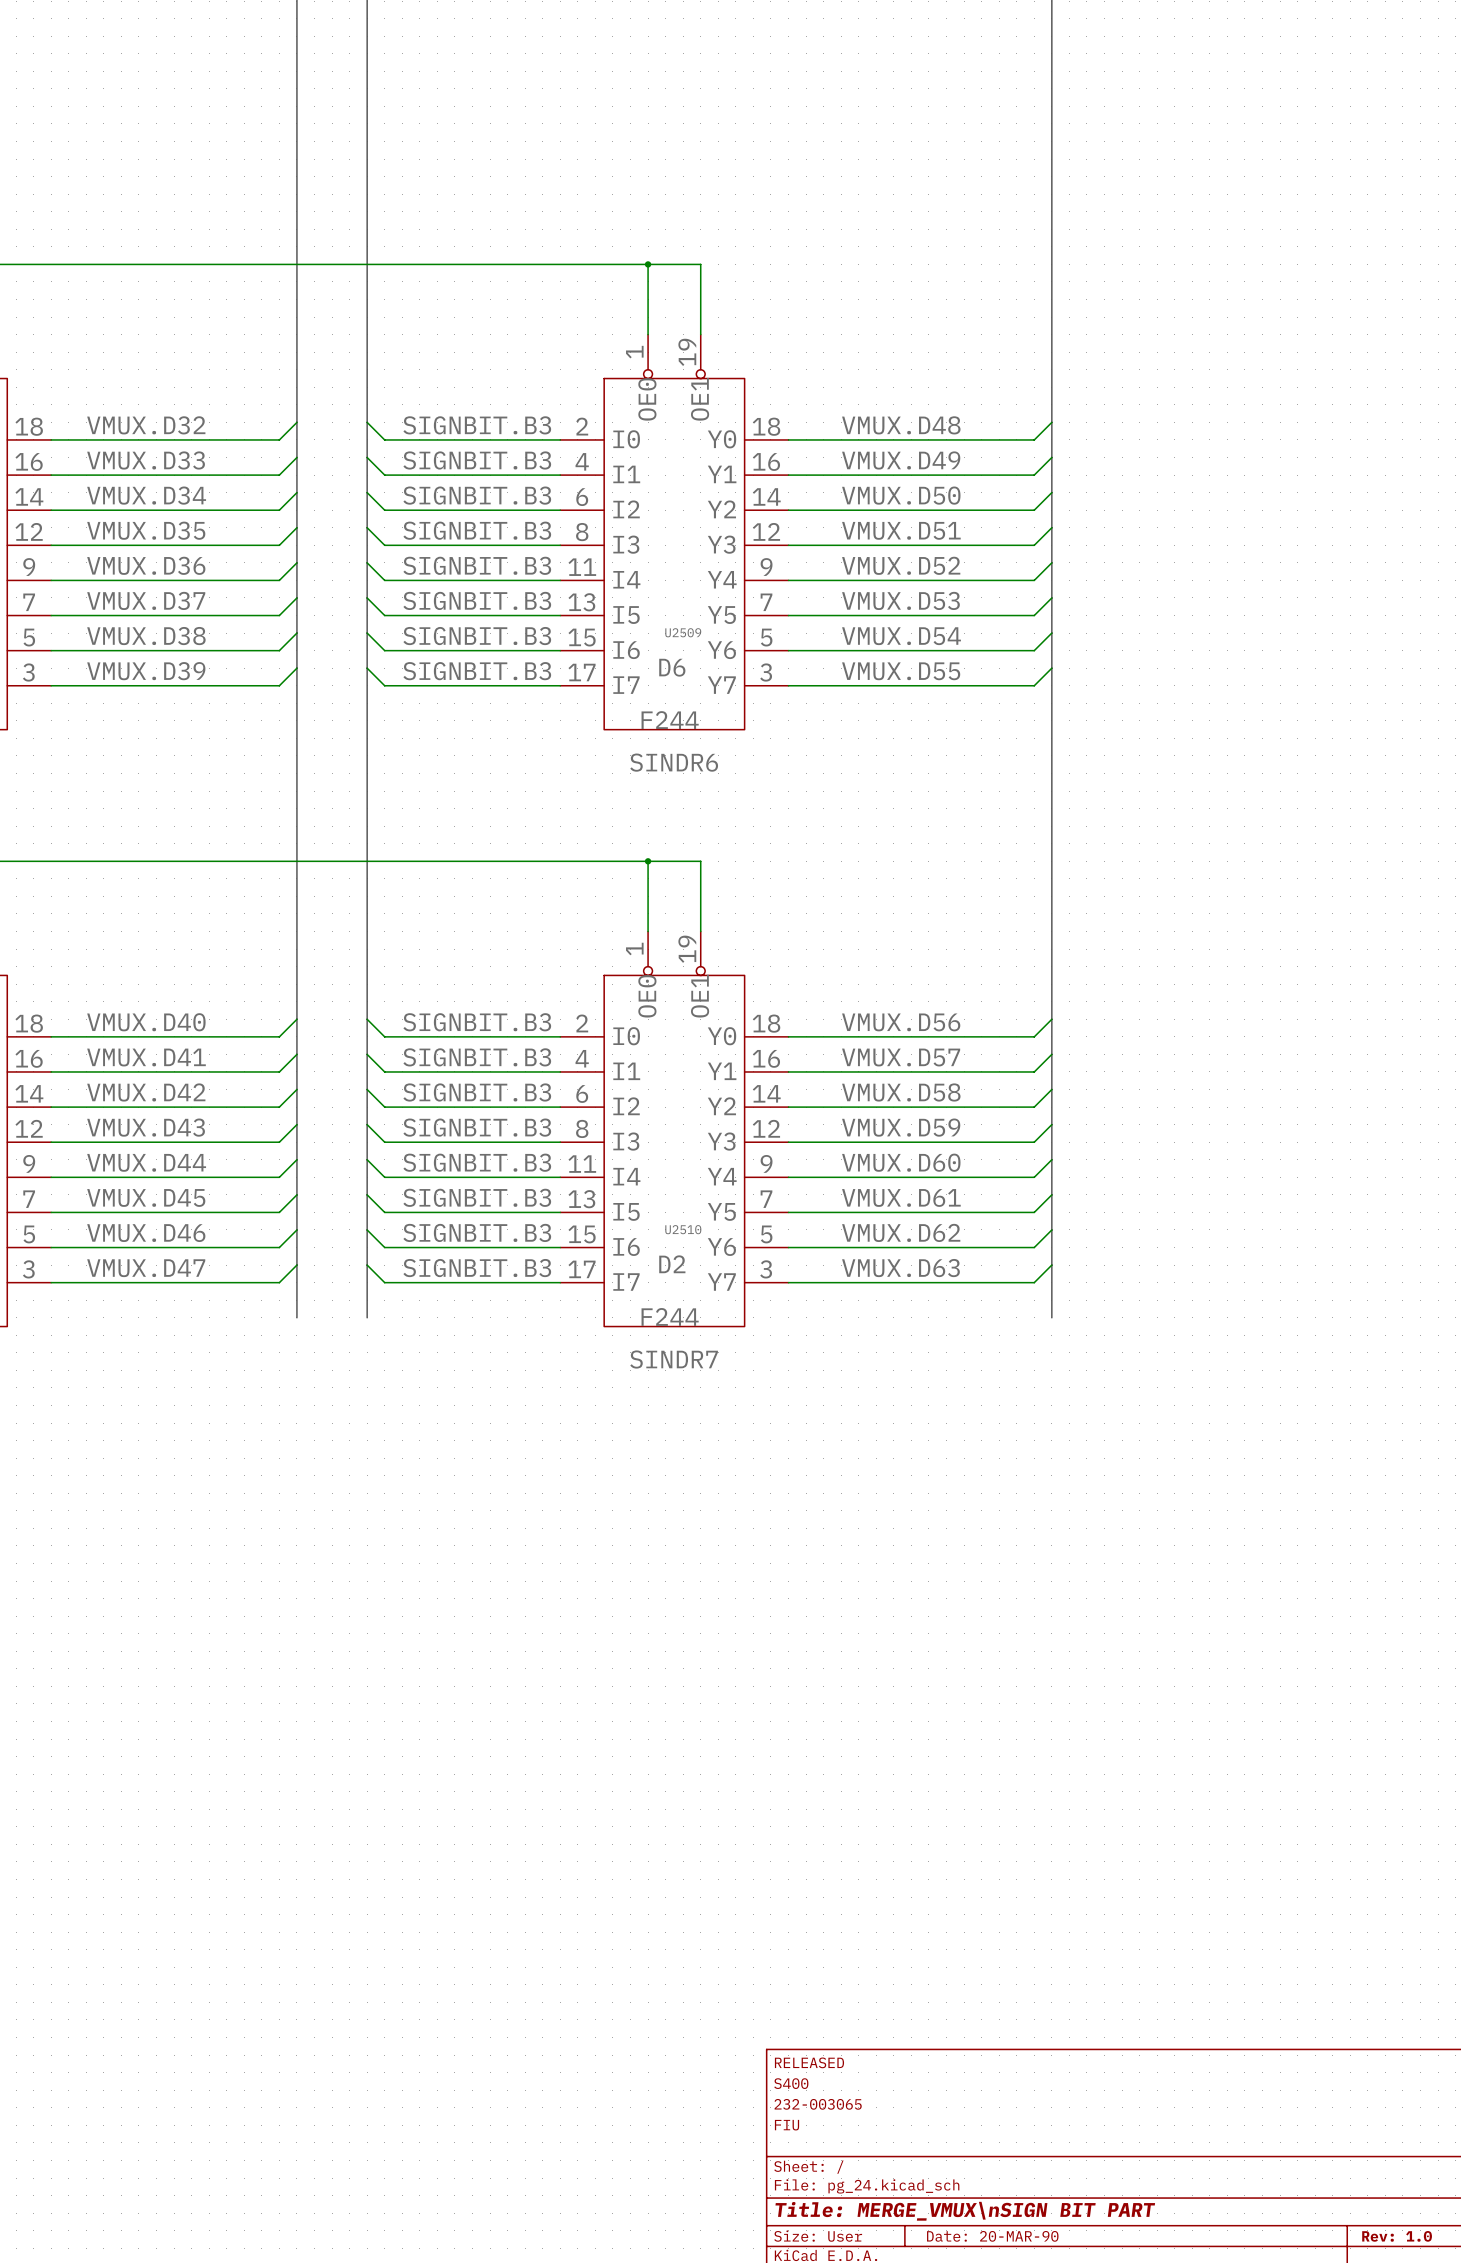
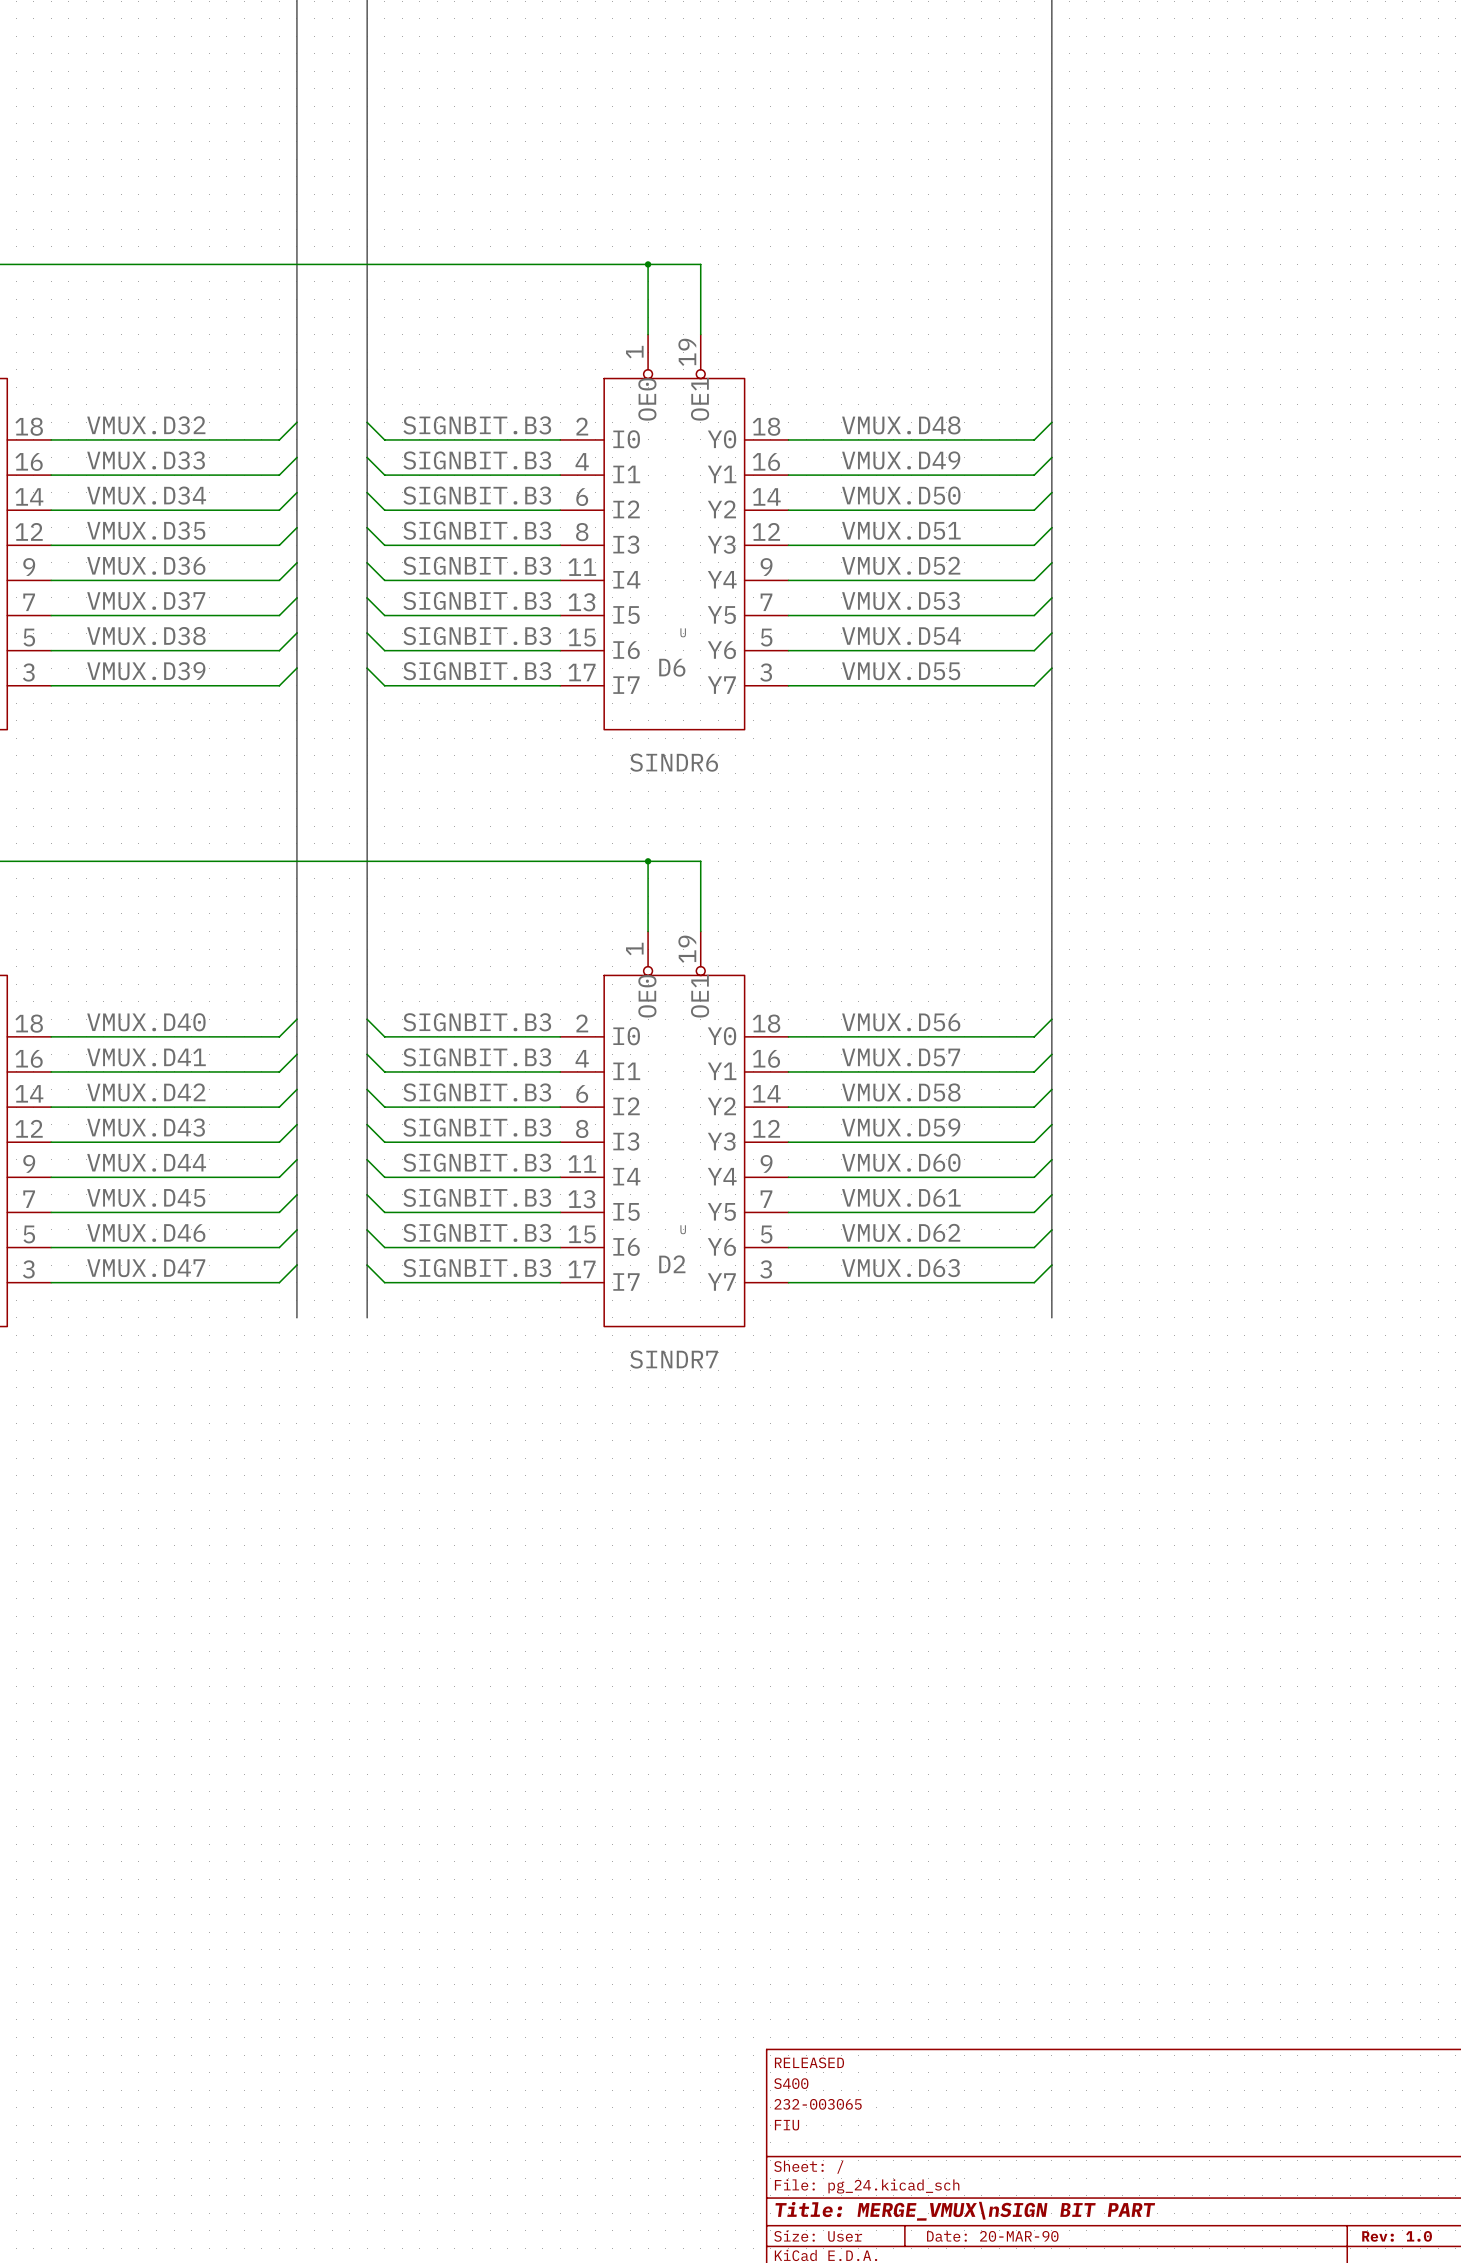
U2509 name: U2509 (683, 632) -> U (683, 632)
U2509 value: F244 (670, 720) -> none
U2510 name: U2510 (683, 1229) -> U (683, 1229)
U2510 value: F244 (670, 1316) -> none

